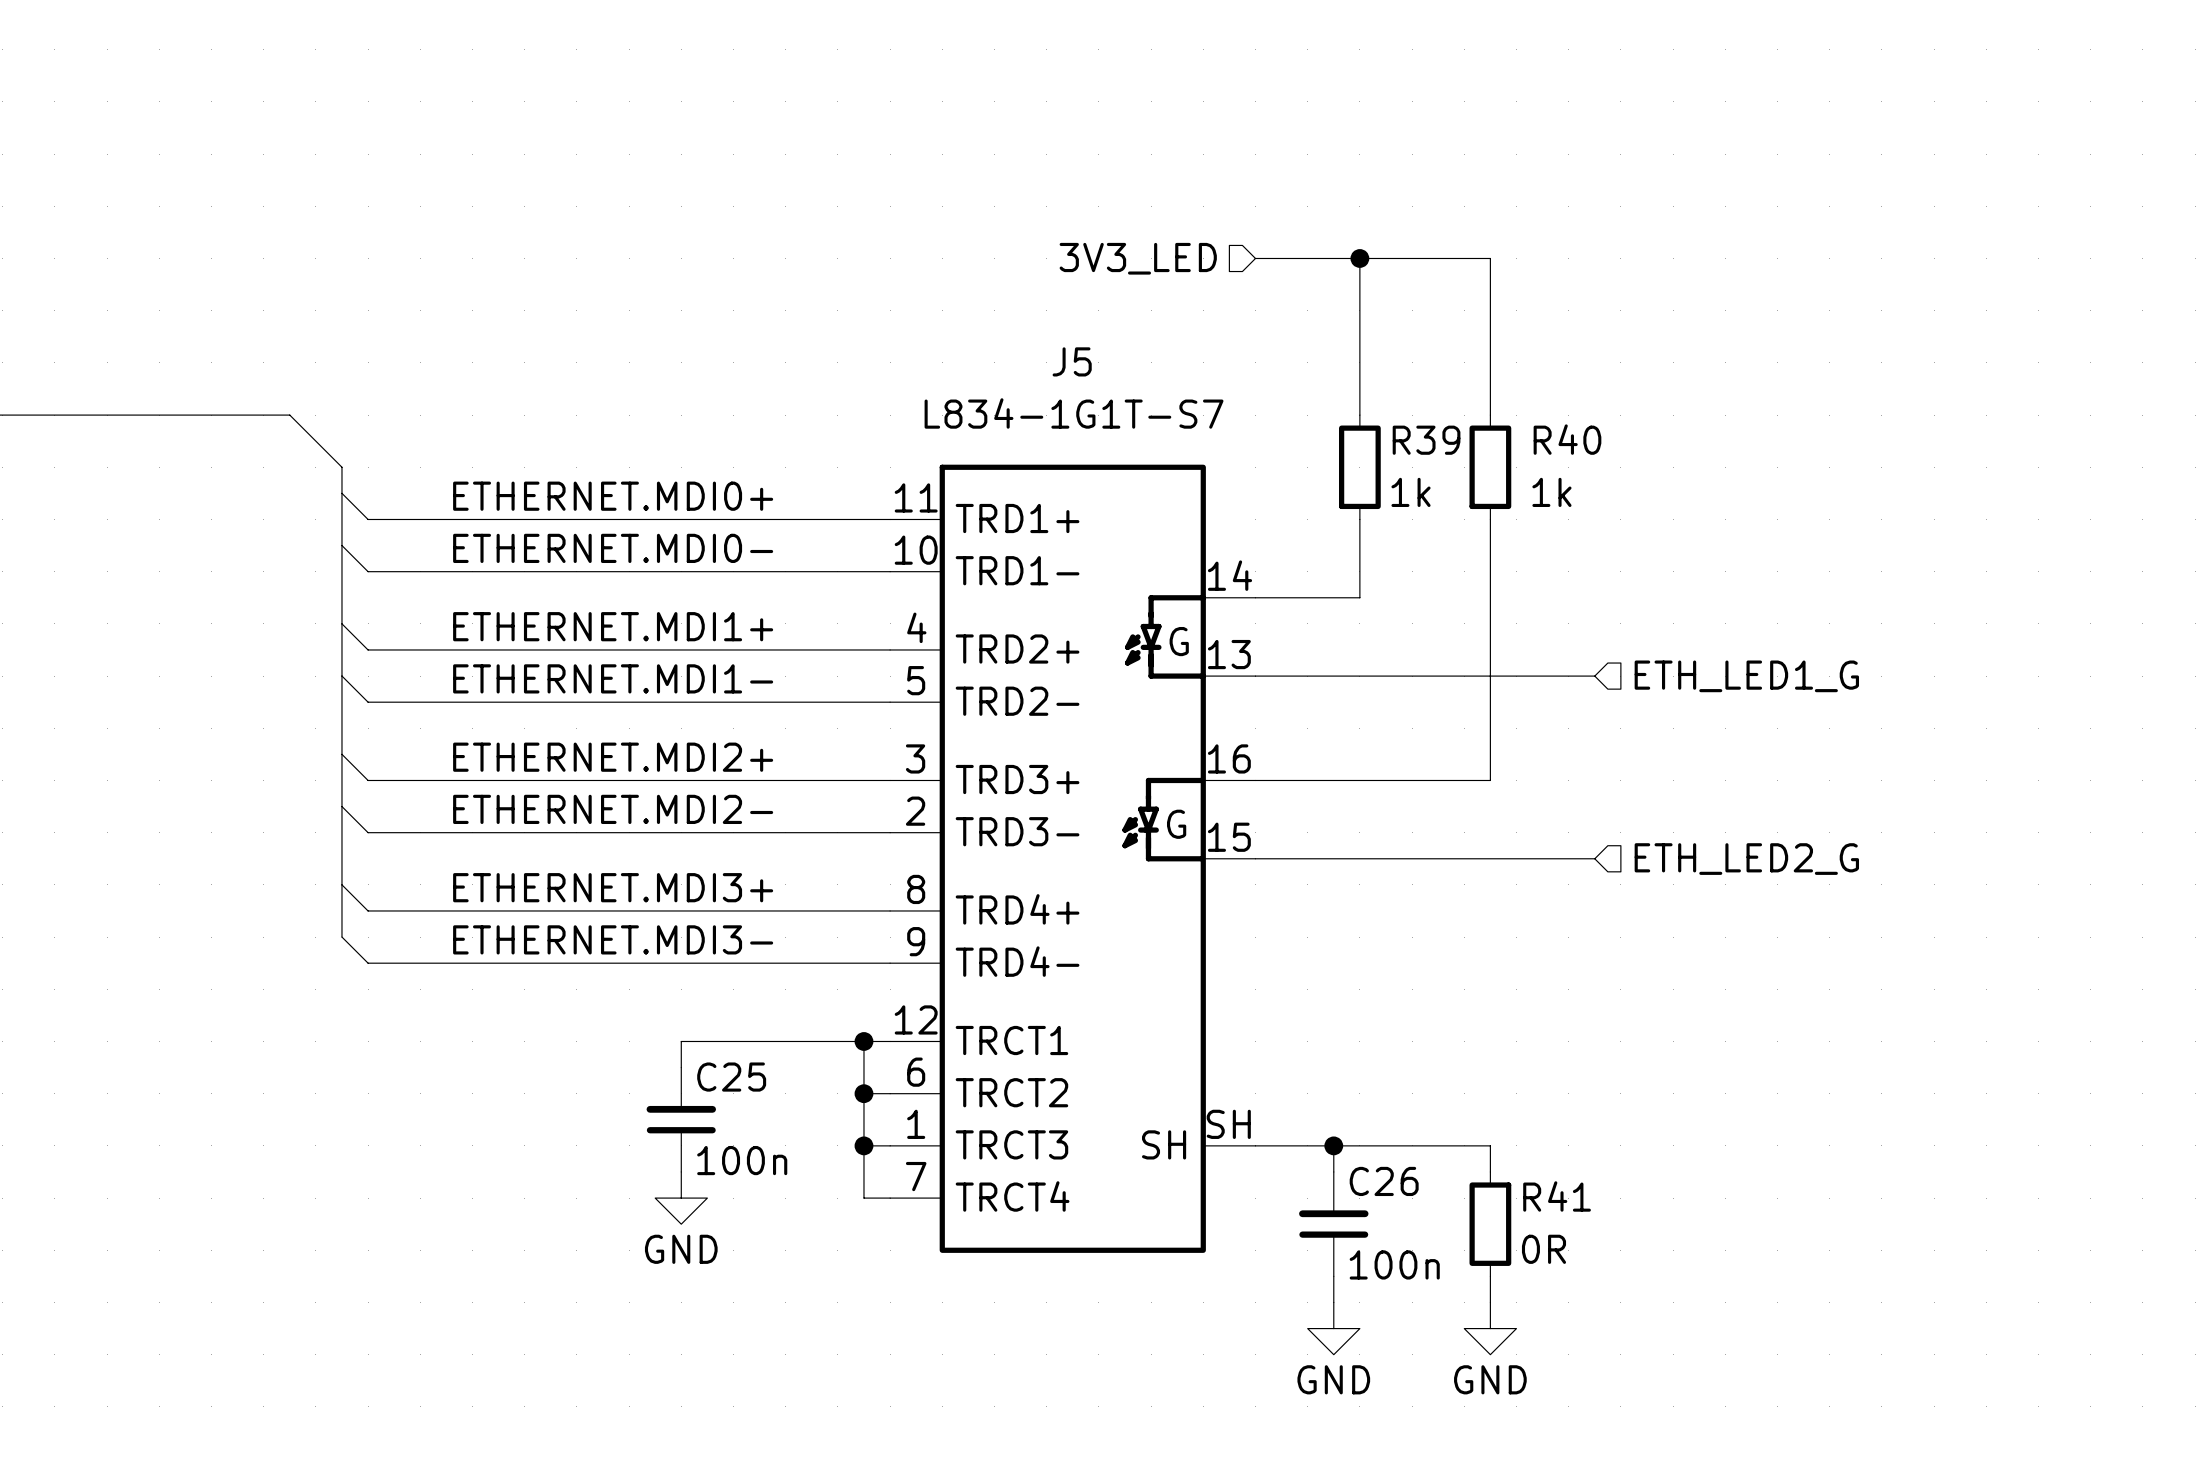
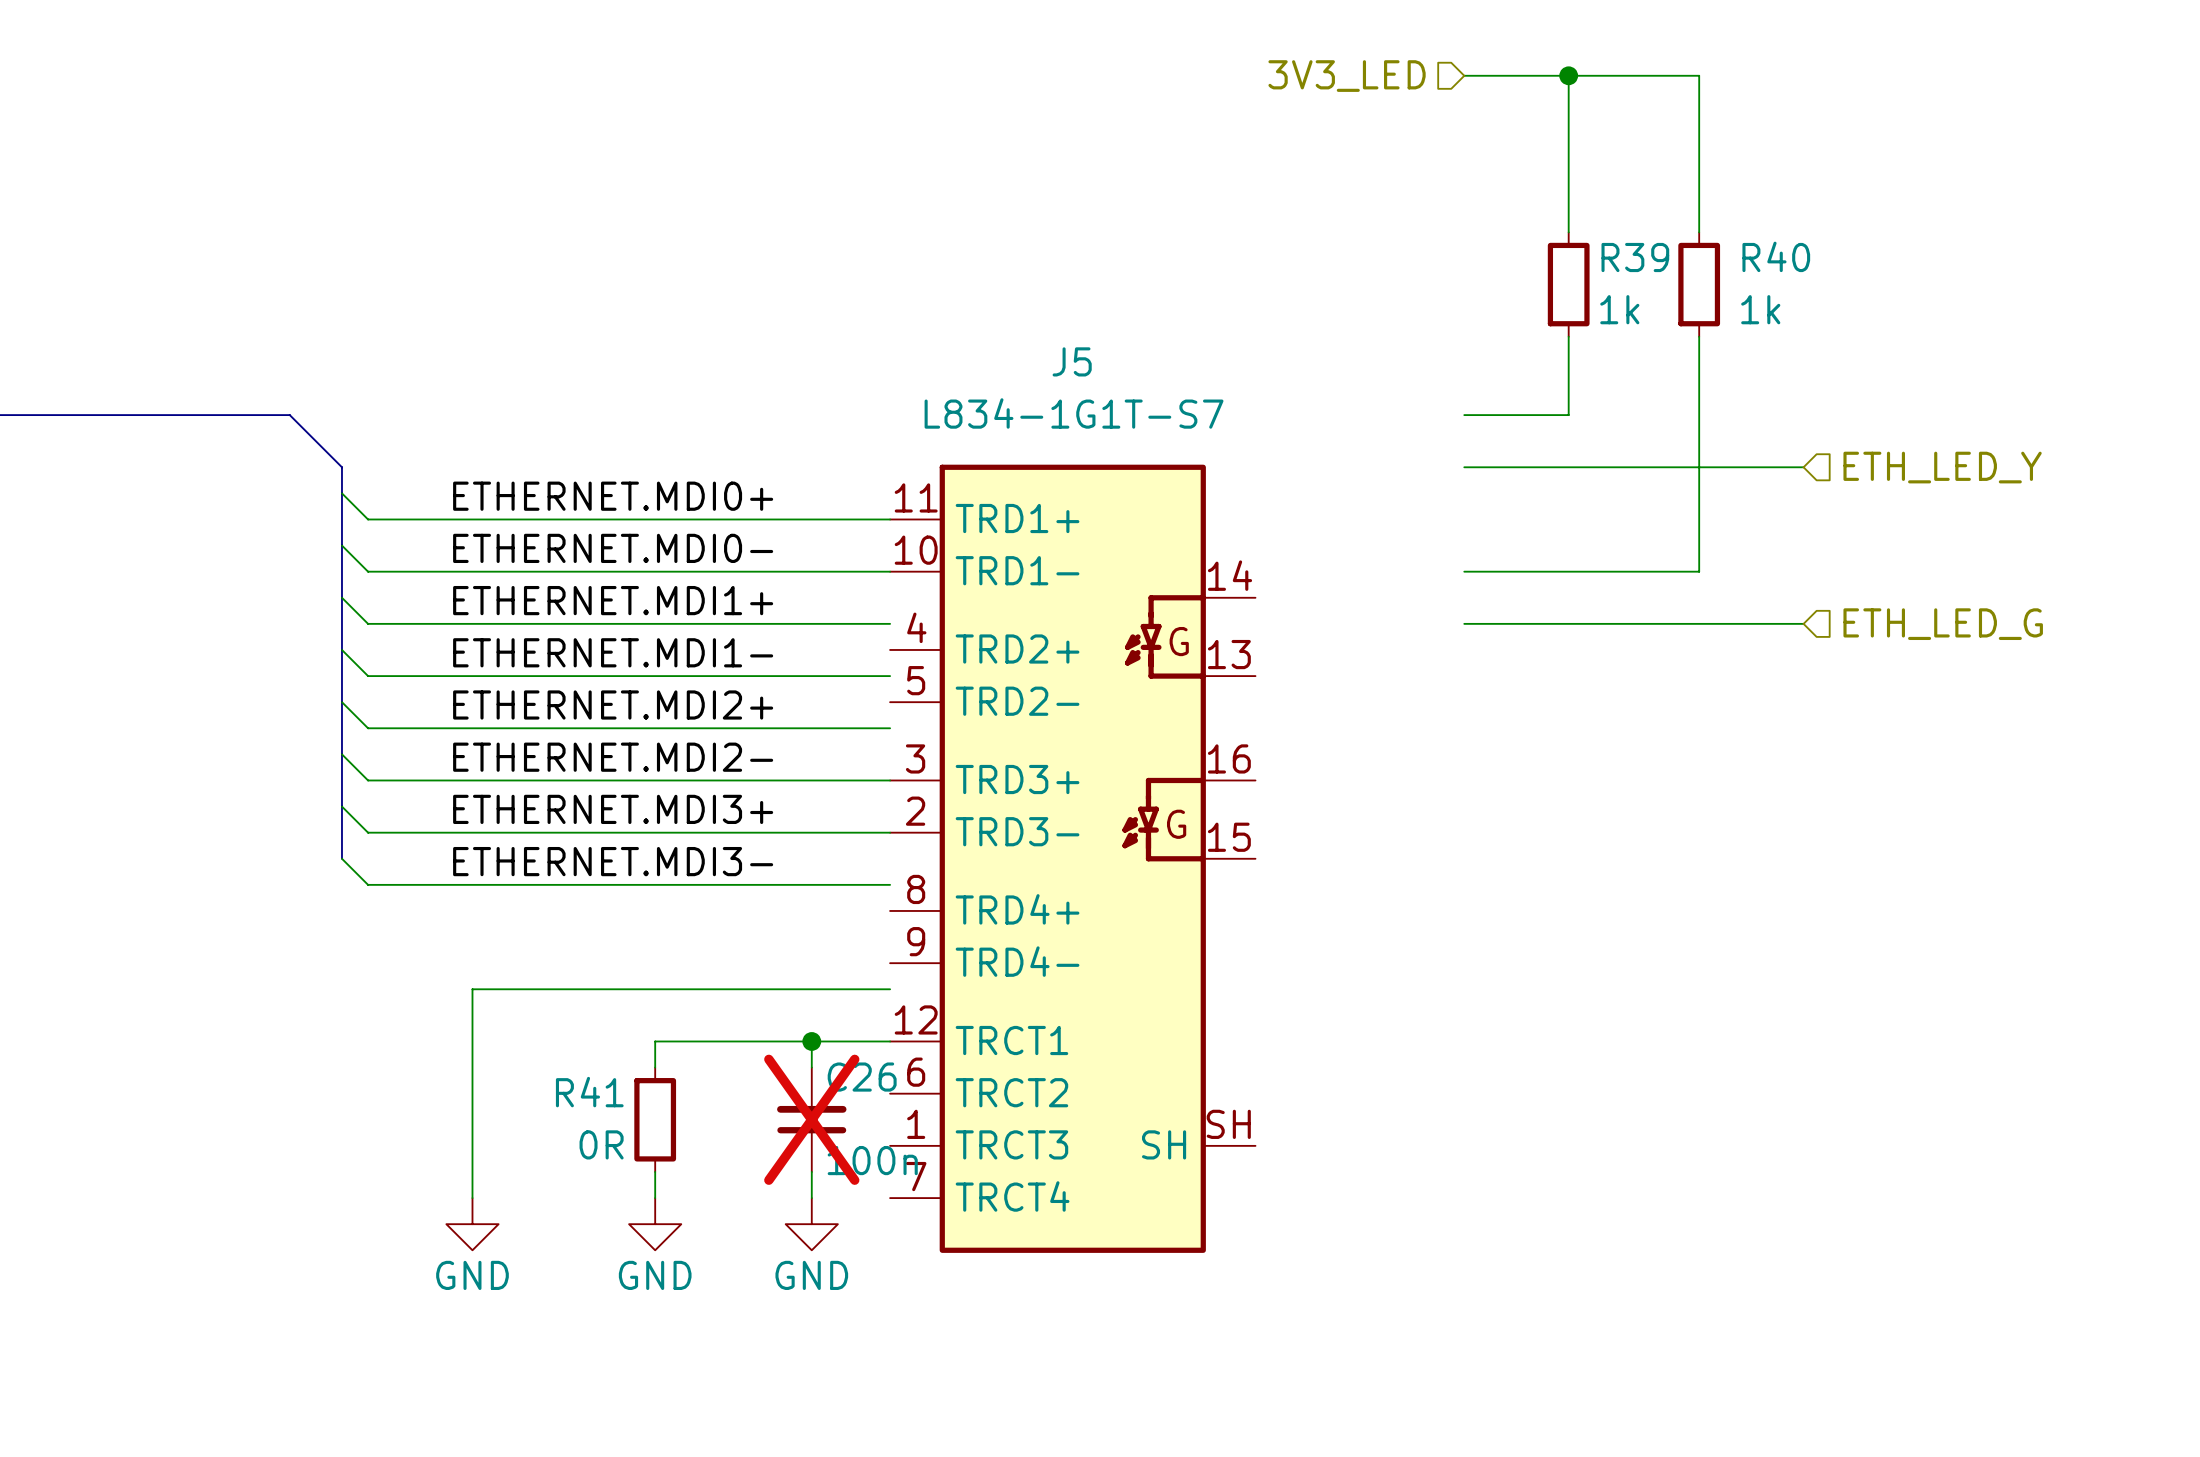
junction: none -> (1568, 75)
hierarchical label position: 3V3_LED (1138, 258) -> 3V3_LED (1347, 76)
wire: (1255, 258) (1490, 258) (1490, 415) -> (1464, 75) (1699, 75) (1699, 232)
wire: (1359, 258) (1359, 415) -> (1568, 75) (1568, 232)
junction: (1359, 258) -> none
wire: none -> (1699, 336) (1699, 571) (1464, 571)
R39 position: (1359, 467) -> (1568, 284)
R40 position: (1490, 467) -> (1699, 284)
hierarchical label: none -> ETH_LED_Y (1942, 467)
wire: (1359, 519) (1359, 597) (1255, 597) -> (1568, 336) (1568, 415) (1464, 415)
wire: (1490, 519) (1490, 780) (1255, 780) -> none
wire: (341, 623) (368, 649) (890, 649) -> (341, 597) (368, 623) (890, 623)
label position: ETHERNET.MDI1+ (613, 626) -> ETHERNET.MDI1+ (613, 600)
wire: (341, 676) (368, 702) (890, 702) -> (341, 649) (368, 676) (890, 676)
wire: (1255, 676) (1594, 676) -> (1464, 623) (1803, 623)
hierarchical label: ETH_LED1_G (1746, 676) -> ETH_LED_G (1943, 624)
label position: ETHERNET.MDI1- (613, 678) -> ETHERNET.MDI1- (613, 652)
label: none -> ETHERNET.MDI2+ (613, 704)
label: ETHERNET.MDI2+ (613, 757) -> ETHERNET.MDI2- (613, 757)
label: ETHERNET.MDI2- (613, 809) -> ETHERNET.MDI3+ (613, 809)
bus: (341, 858) (341, 937) -> none
wire: (1255, 858) (1594, 858) -> (1464, 467) (1803, 467)
hierarchical label: ETH_LED2_G (1746, 859) -> none
wire: (341, 884) (368, 910) (890, 910) -> (341, 858) (368, 884) (890, 884)
label: ETHERNET.MDI3+ (613, 887) -> none
wire: (341, 937) (368, 963) (890, 963) -> (341, 702) (368, 728) (890, 728)
label position: ETHERNET.MDI3- (613, 939) -> ETHERNET.MDI3- (613, 861)
wire: none -> (890, 989) (472, 989) (472, 1198)
wire: (681, 1041) (681, 1067) -> (681, 1041) (655, 1041) (655, 1067)
wire: none -> (811, 1041) (811, 1067)
junction: none -> (811, 1041)
wire: (863, 1041) (863, 1198) (890, 1198) -> none
junction: (863, 1041) -> none
wire: (863, 1093) (890, 1093) -> none
junction: (863, 1093) -> none
C25: (681, 1119) -> none
C26 do-not-place cross: none -> (811, 1119)
wire: (863, 1145) (890, 1145) -> none
junction: (863, 1145) -> none
wire: (1255, 1145) (1490, 1145) (1490, 1171) -> none
wire: (1333, 1145) (1333, 1171) -> none
junction: (1333, 1145) -> none
wire: none -> (655, 1171) (655, 1198)
wire: none -> (811, 1171) (811, 1198)
R41 name position: R41 (1557, 1196) -> R41 (589, 1092)
power symbol position: GND (681, 1198) -> GND (655, 1224)
power symbol: none -> GND (472, 1224)
power symbol: none -> GND (811, 1224)
C26 position: (1333, 1224) -> (811, 1119)
R41 position: (1490, 1224) -> (655, 1119)
R41 text position: 0R (1543, 1249) -> 0R (601, 1144)
wire: (1333, 1276) (1333, 1302) -> none
wire: (1490, 1276) (1490, 1302) -> none
power symbol: GND (1333, 1328) -> none
power symbol: GND (1490, 1328) -> none

